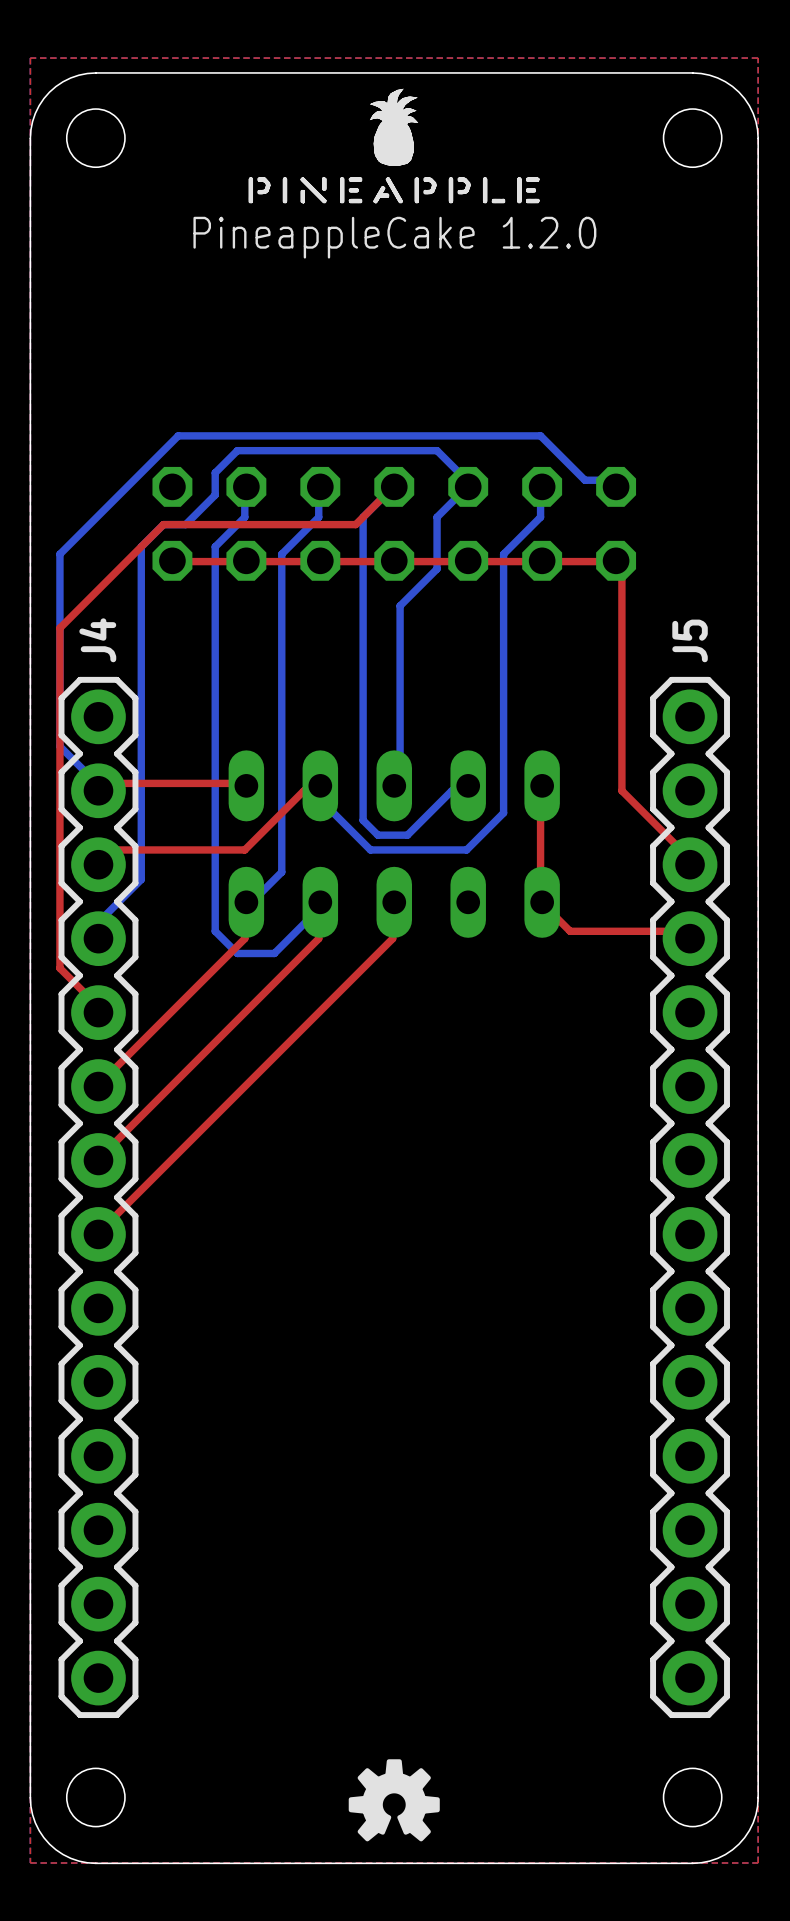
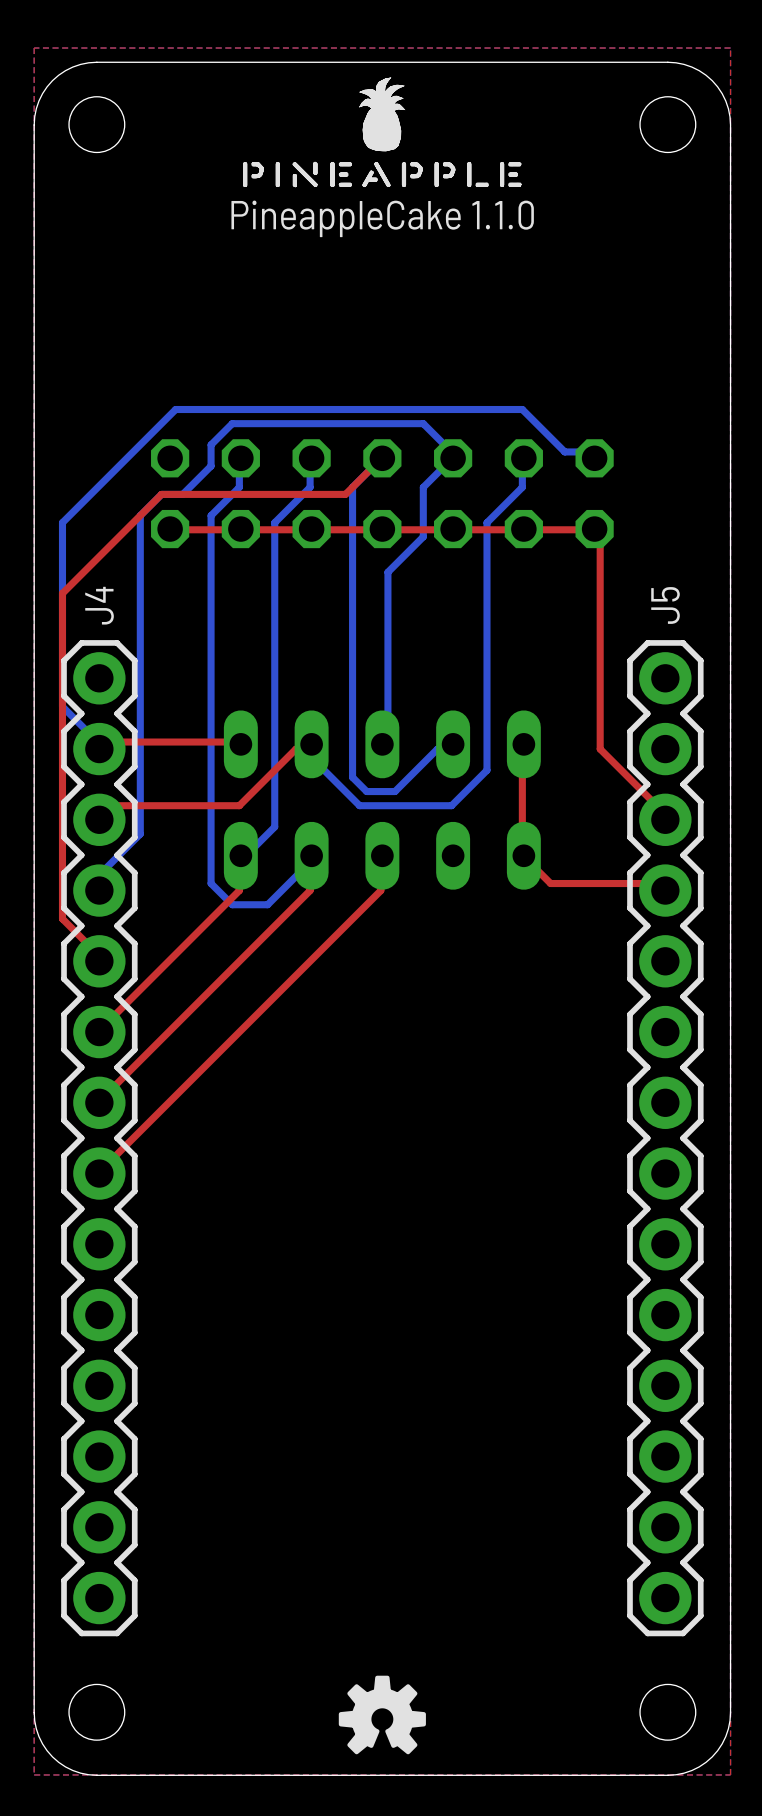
text: PineappleCake 1.2.0 (394, 237) -> PineappleCake 1.1.0 (382, 218)

